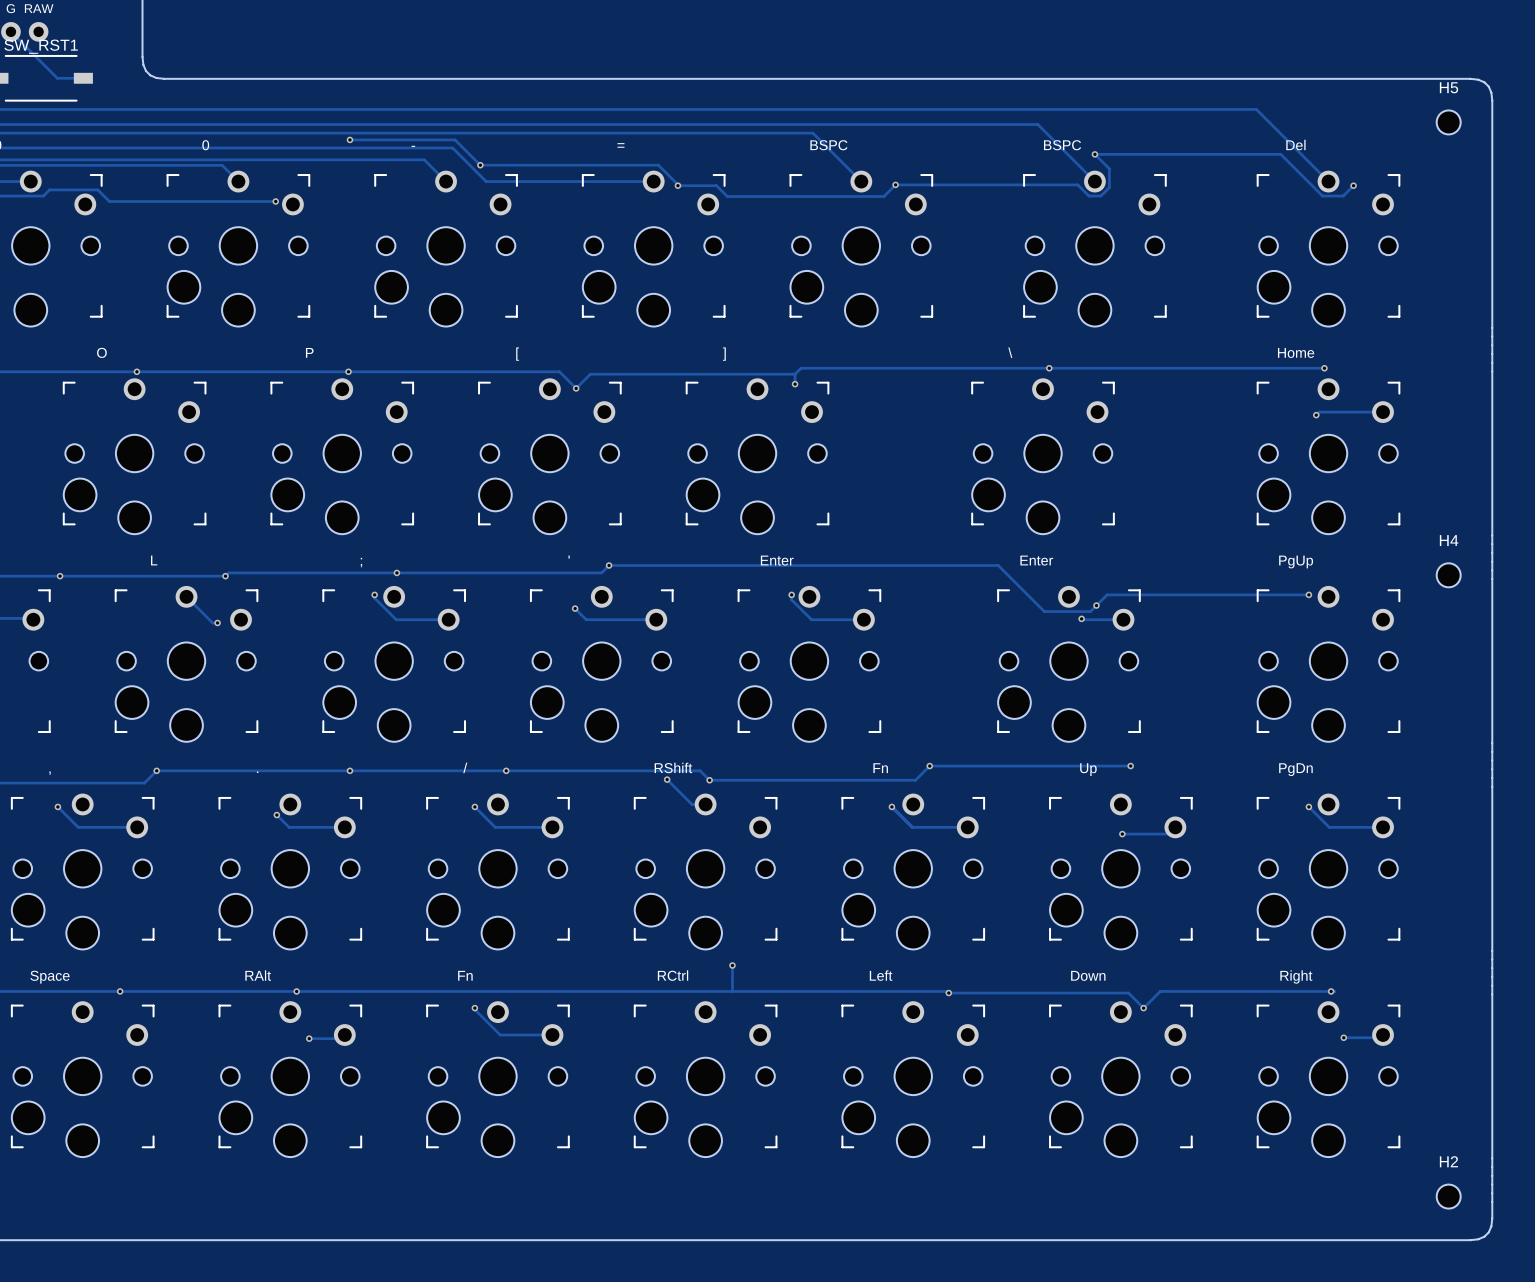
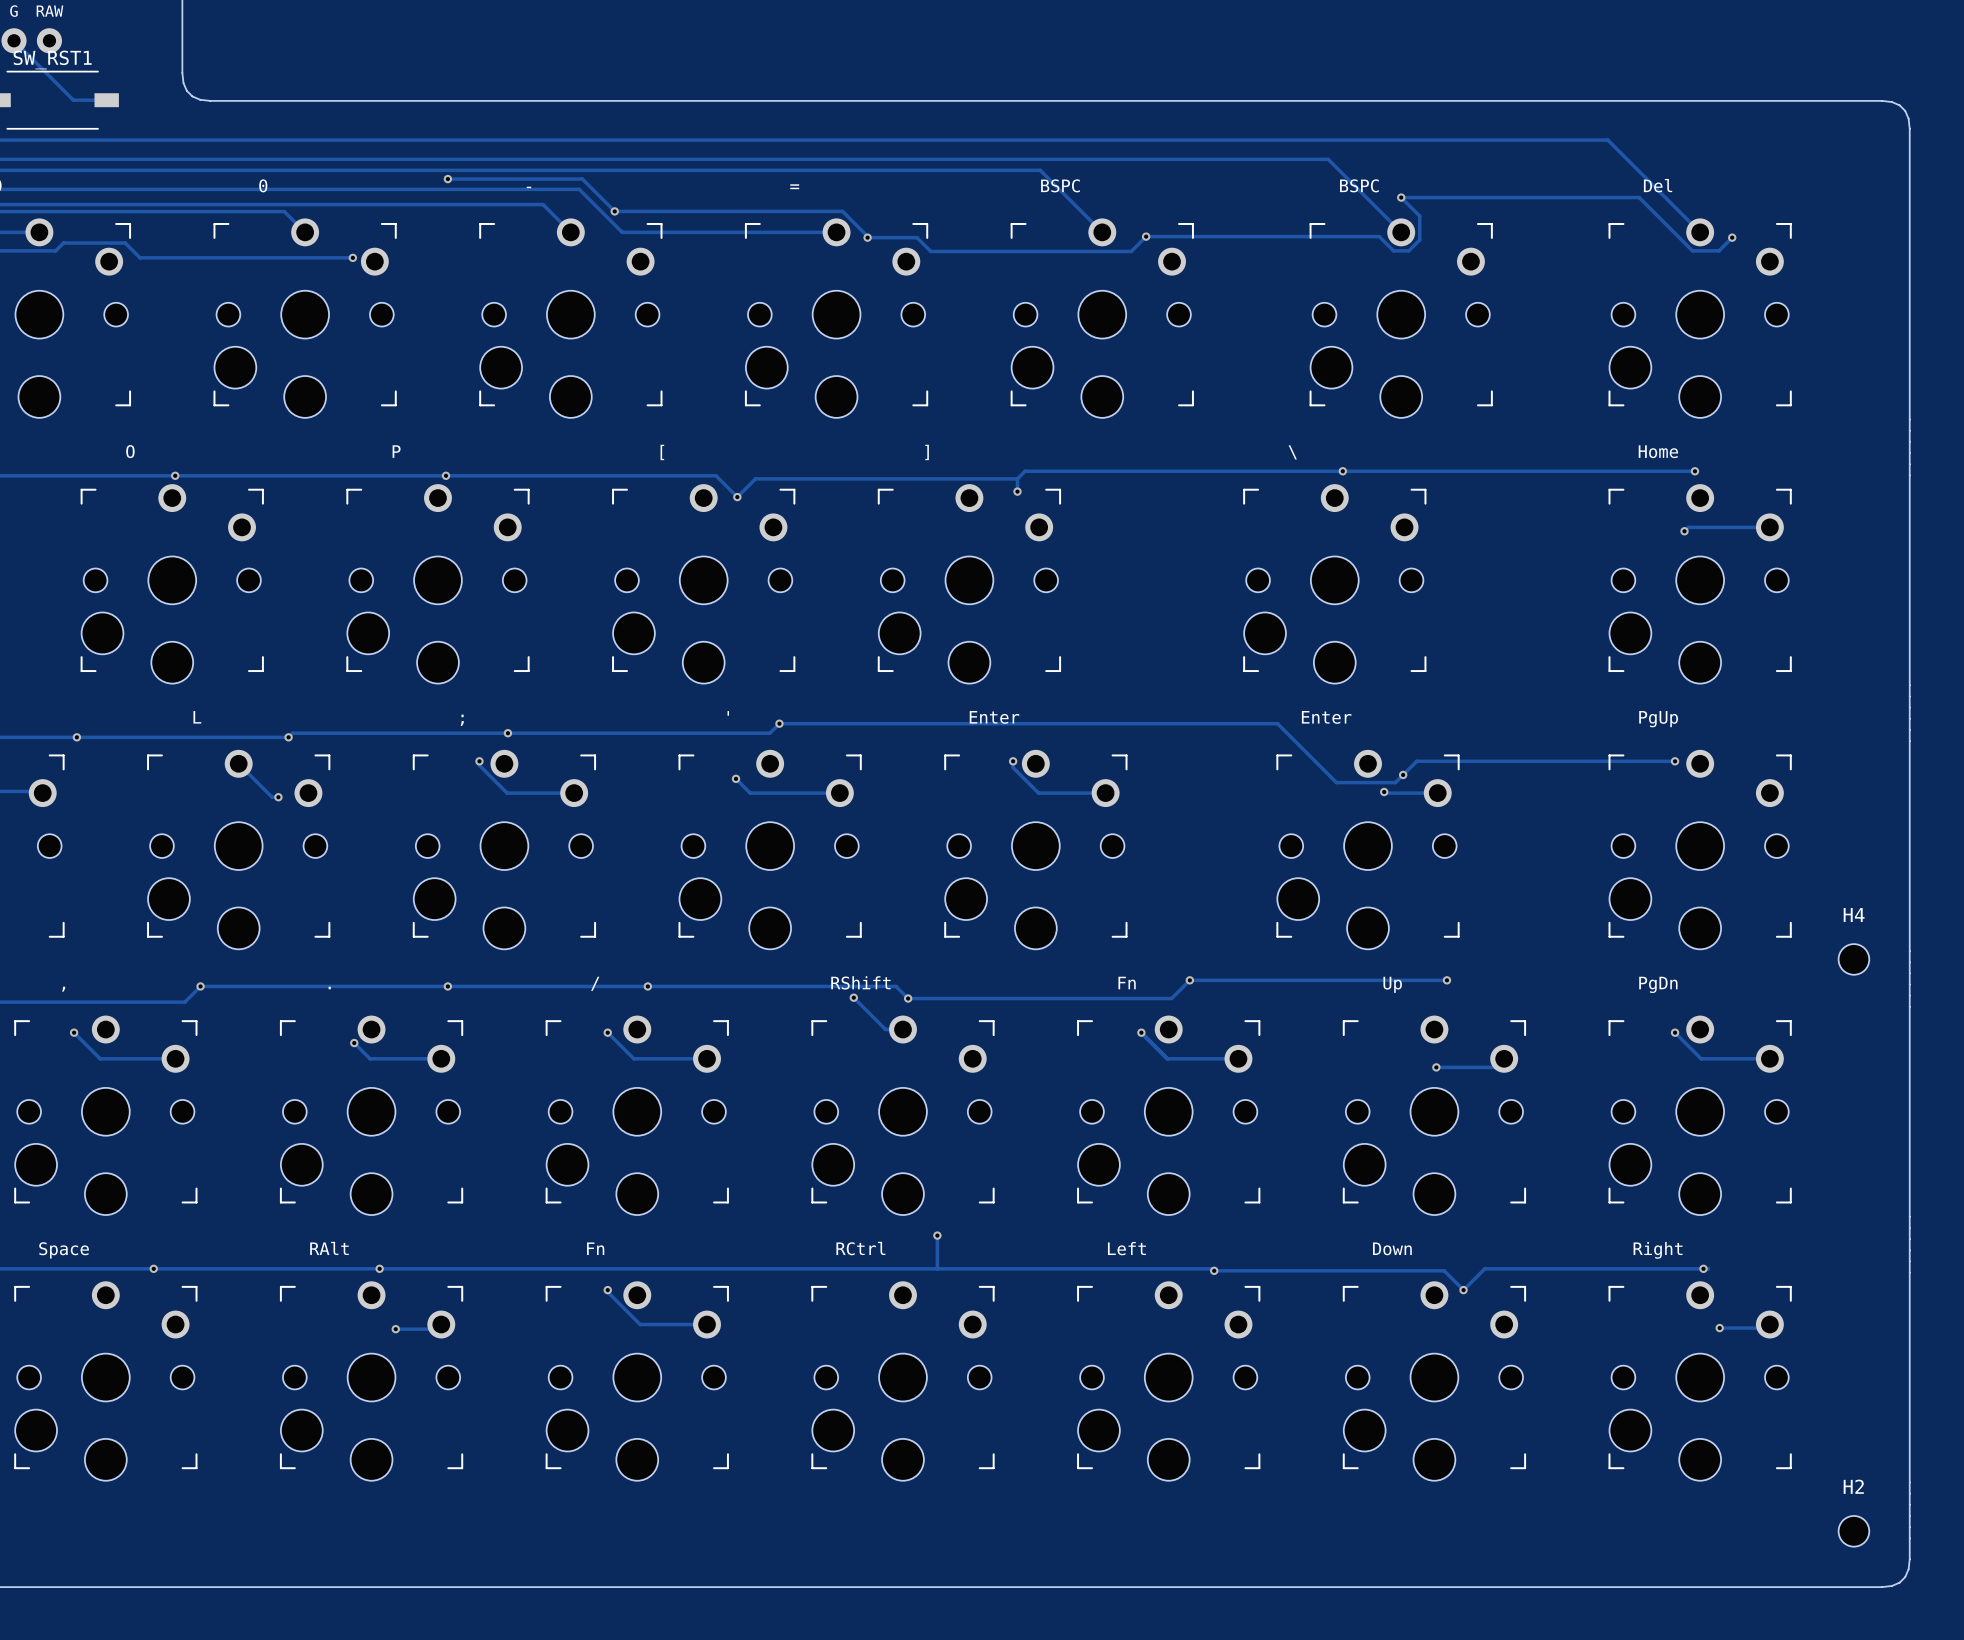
H5: (1448, 122) -> none
H4 position: (1448, 575) -> (1853, 959)

